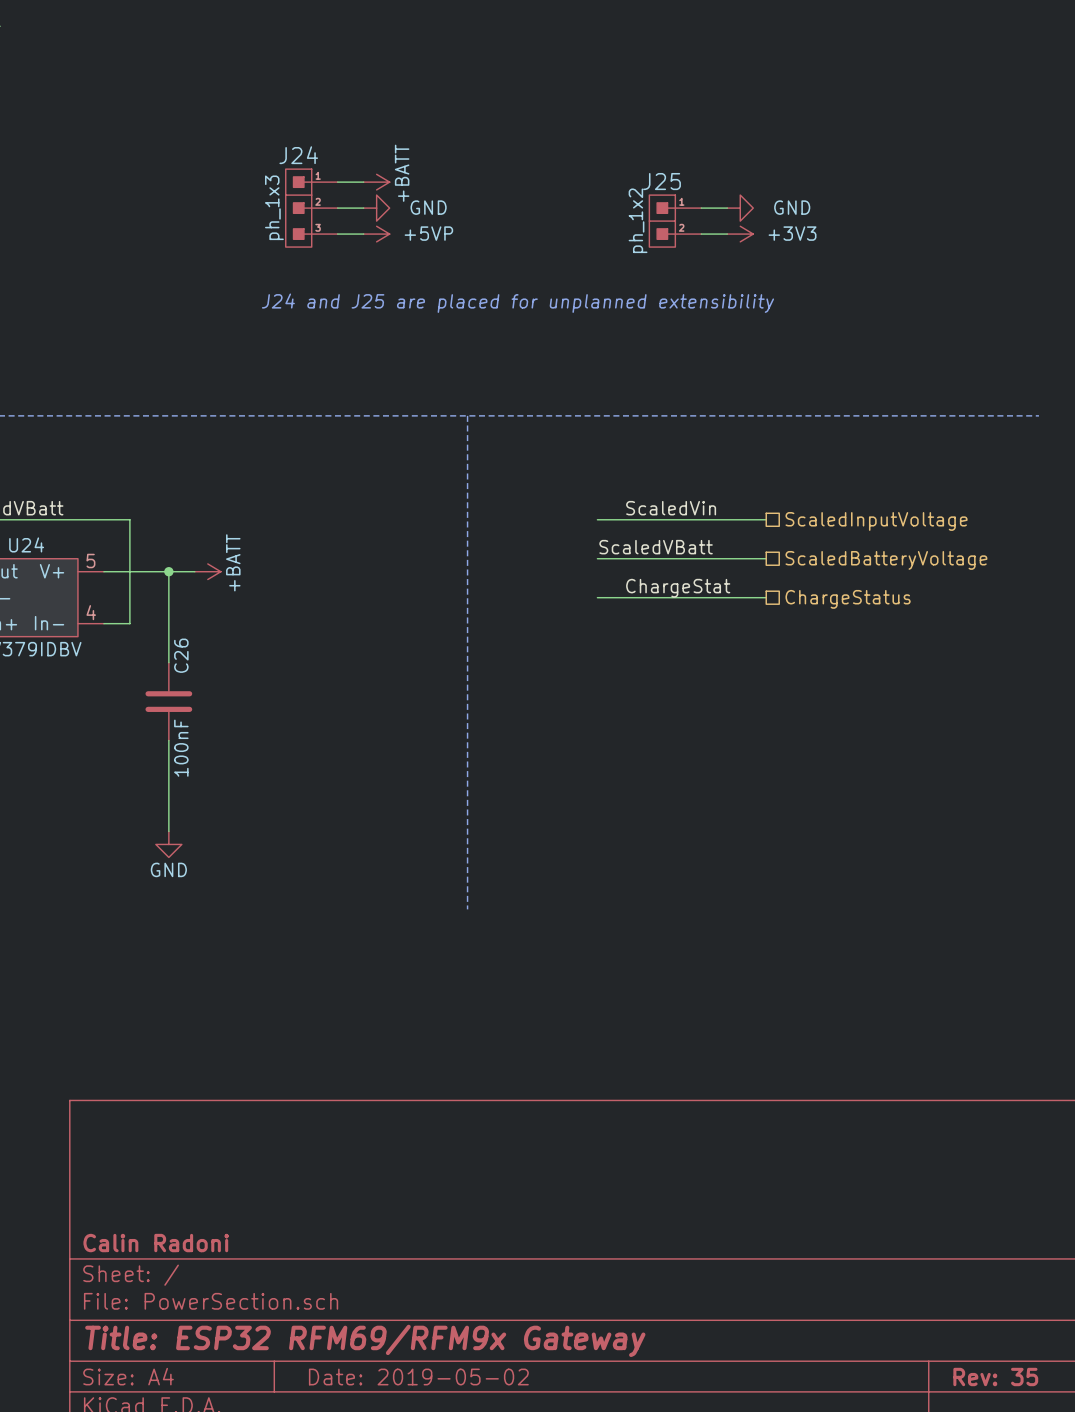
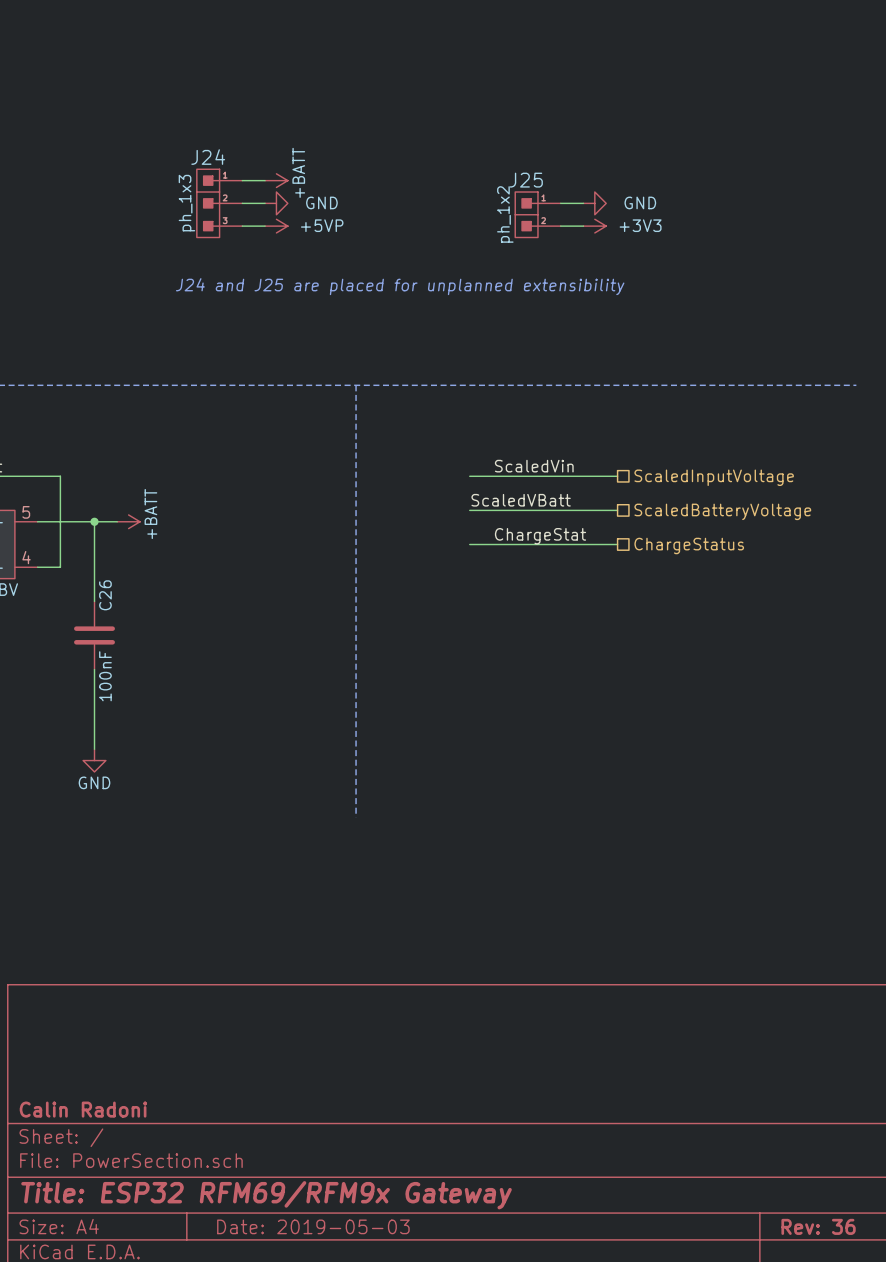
title block: Date: 2019-05-02 (418, 1377) -> Date: 2019-05-03 (313, 1226)
title block: Rev: 35 (995, 1377) -> Rev: 36 (818, 1226)

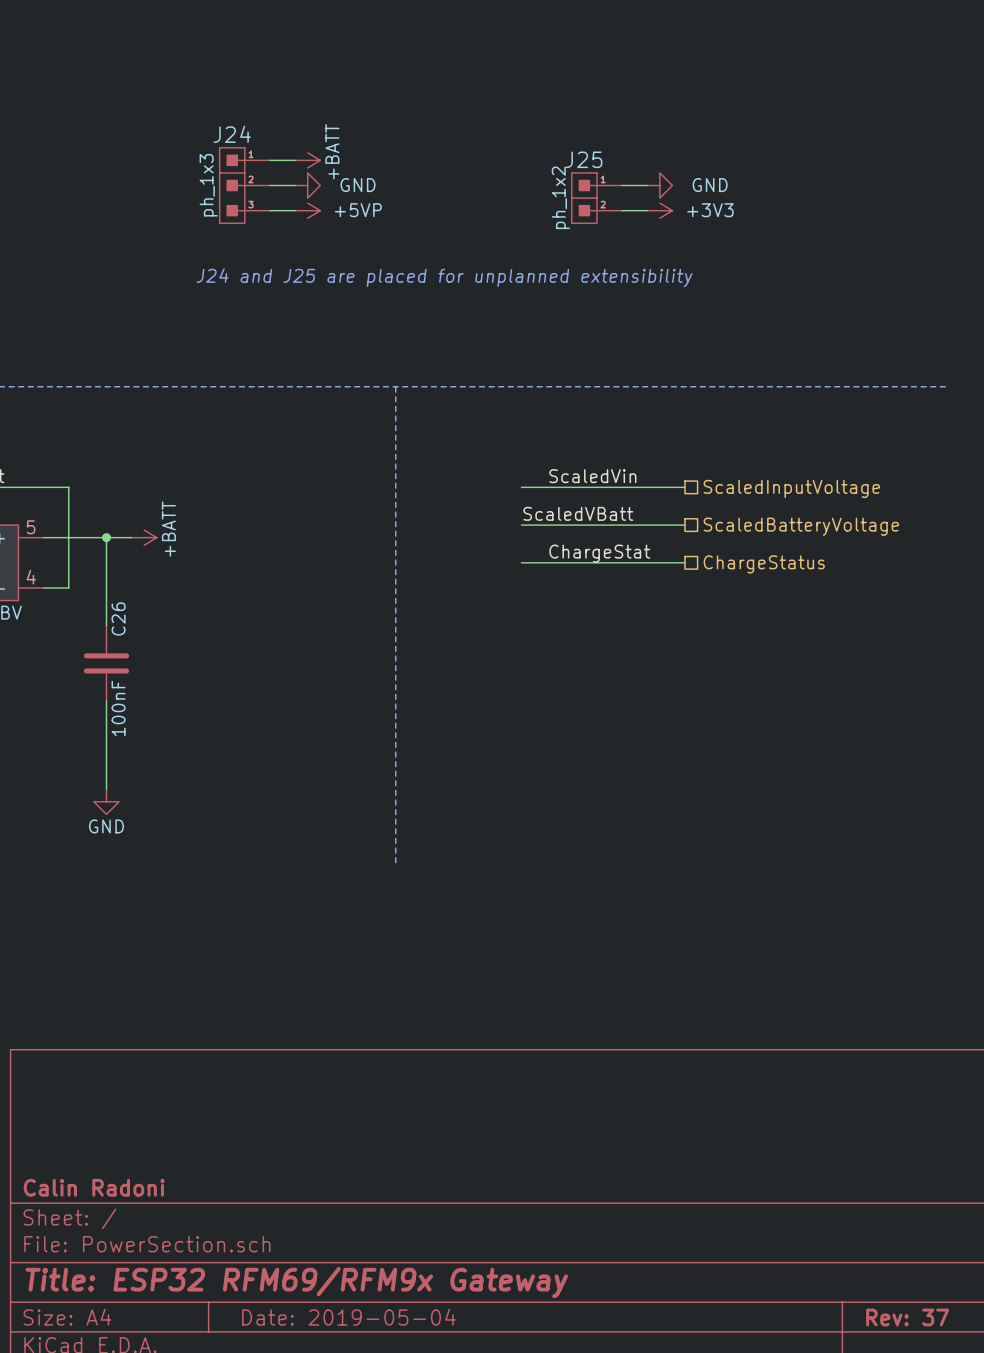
title block: Date: 2019-05-03 (313, 1226) -> Date: 2019-05-04 (348, 1317)
title block: Rev: 36 (818, 1226) -> Rev: 37 (907, 1317)

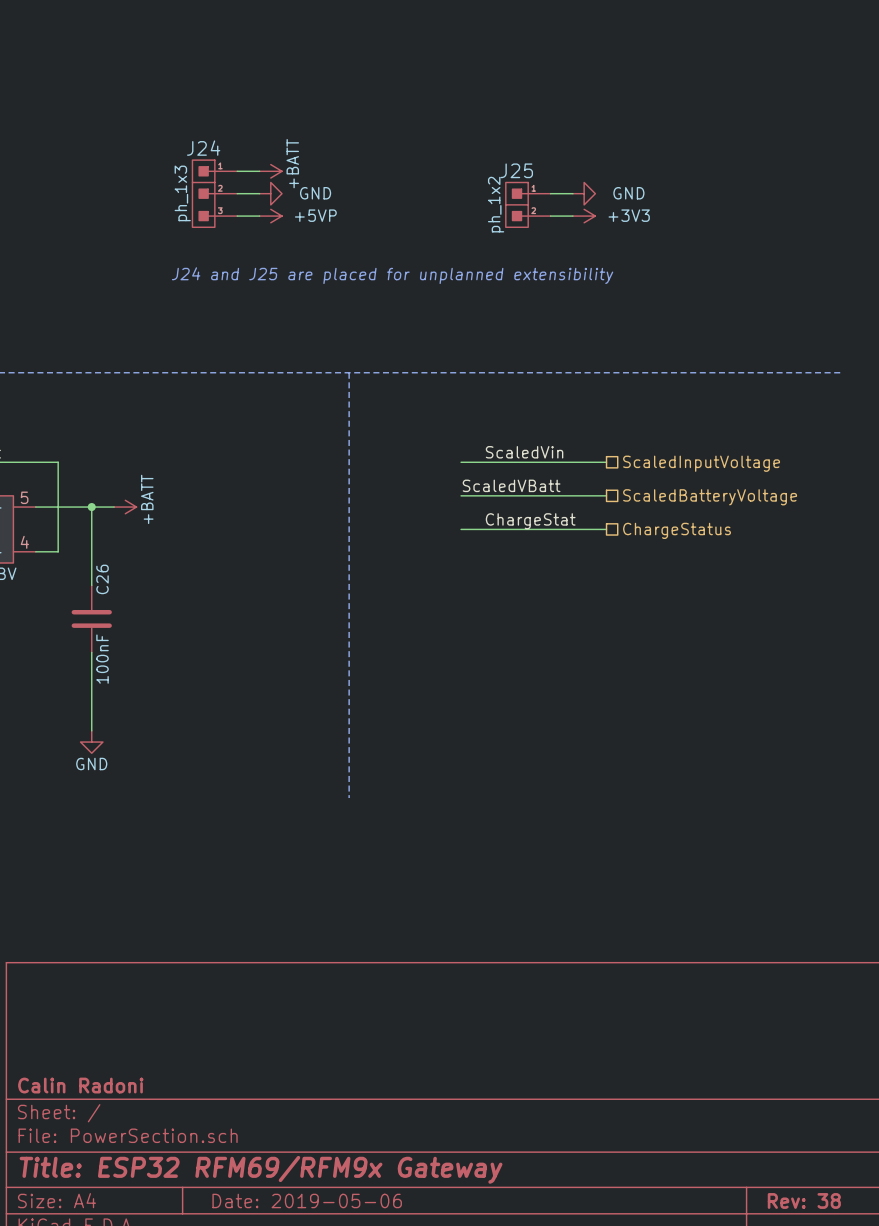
title block: Date: 2019-05-04 (348, 1317) -> Date: 2019-05-06 (307, 1200)
title block: Rev: 37 (907, 1317) -> Rev: 38 (804, 1200)

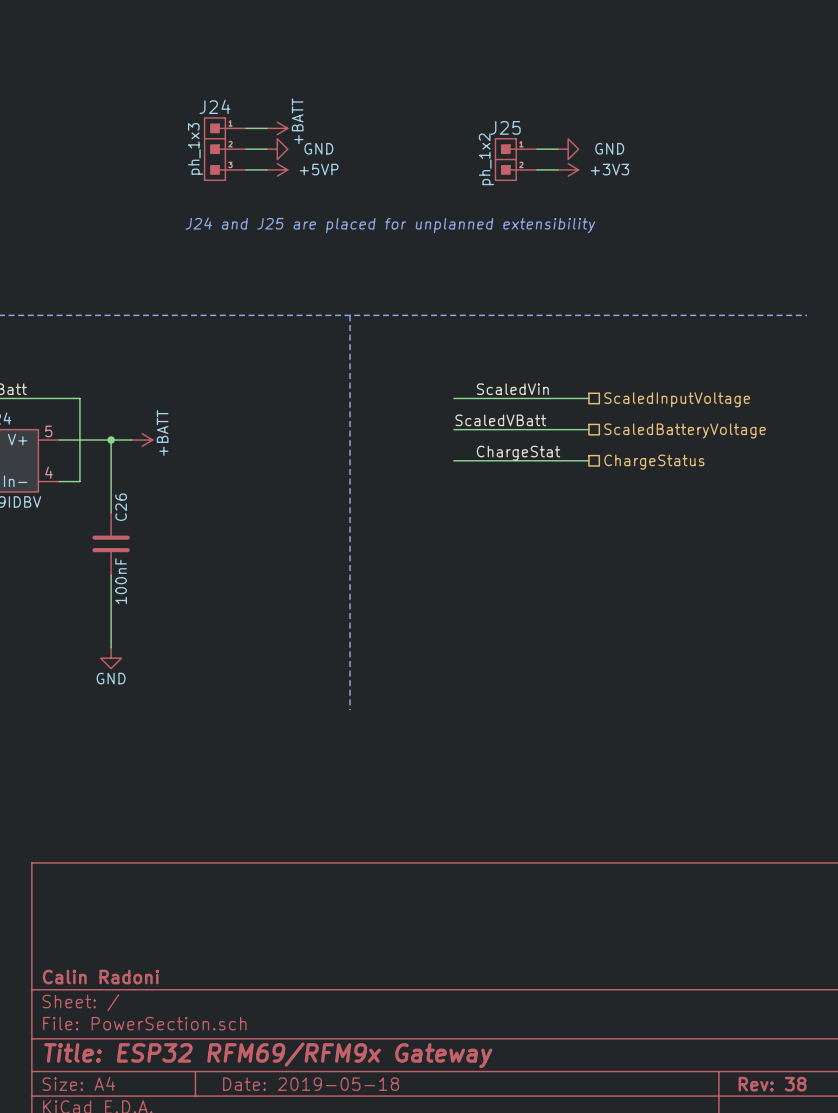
title block: Date: 2019-05-06 (307, 1200) -> Date: 2019-05-18 (311, 1084)

